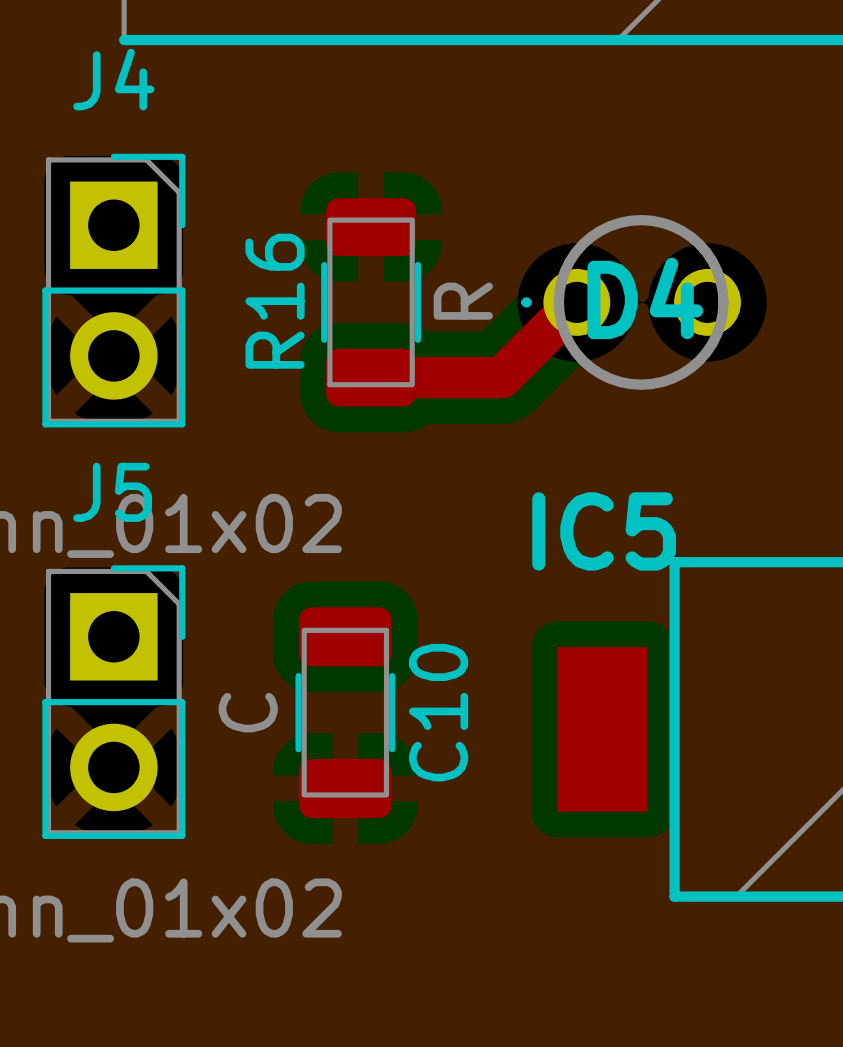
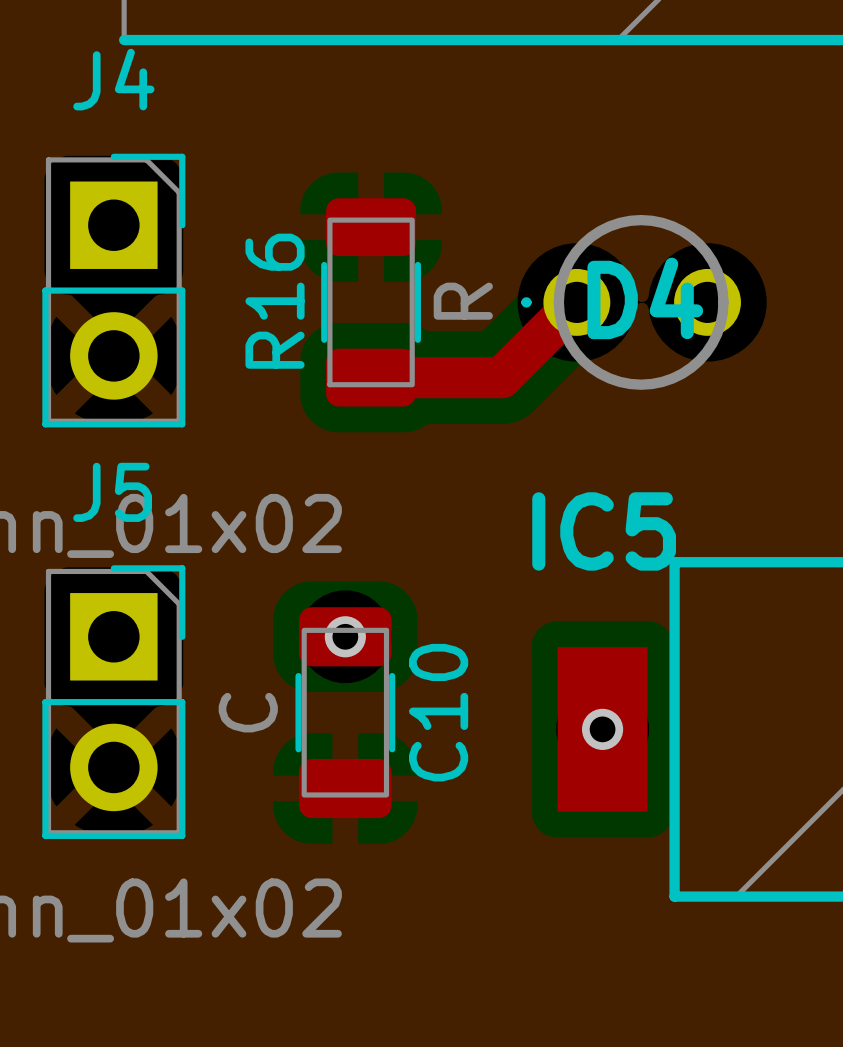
via: none -> (345, 636)
via: none -> (602, 729)

